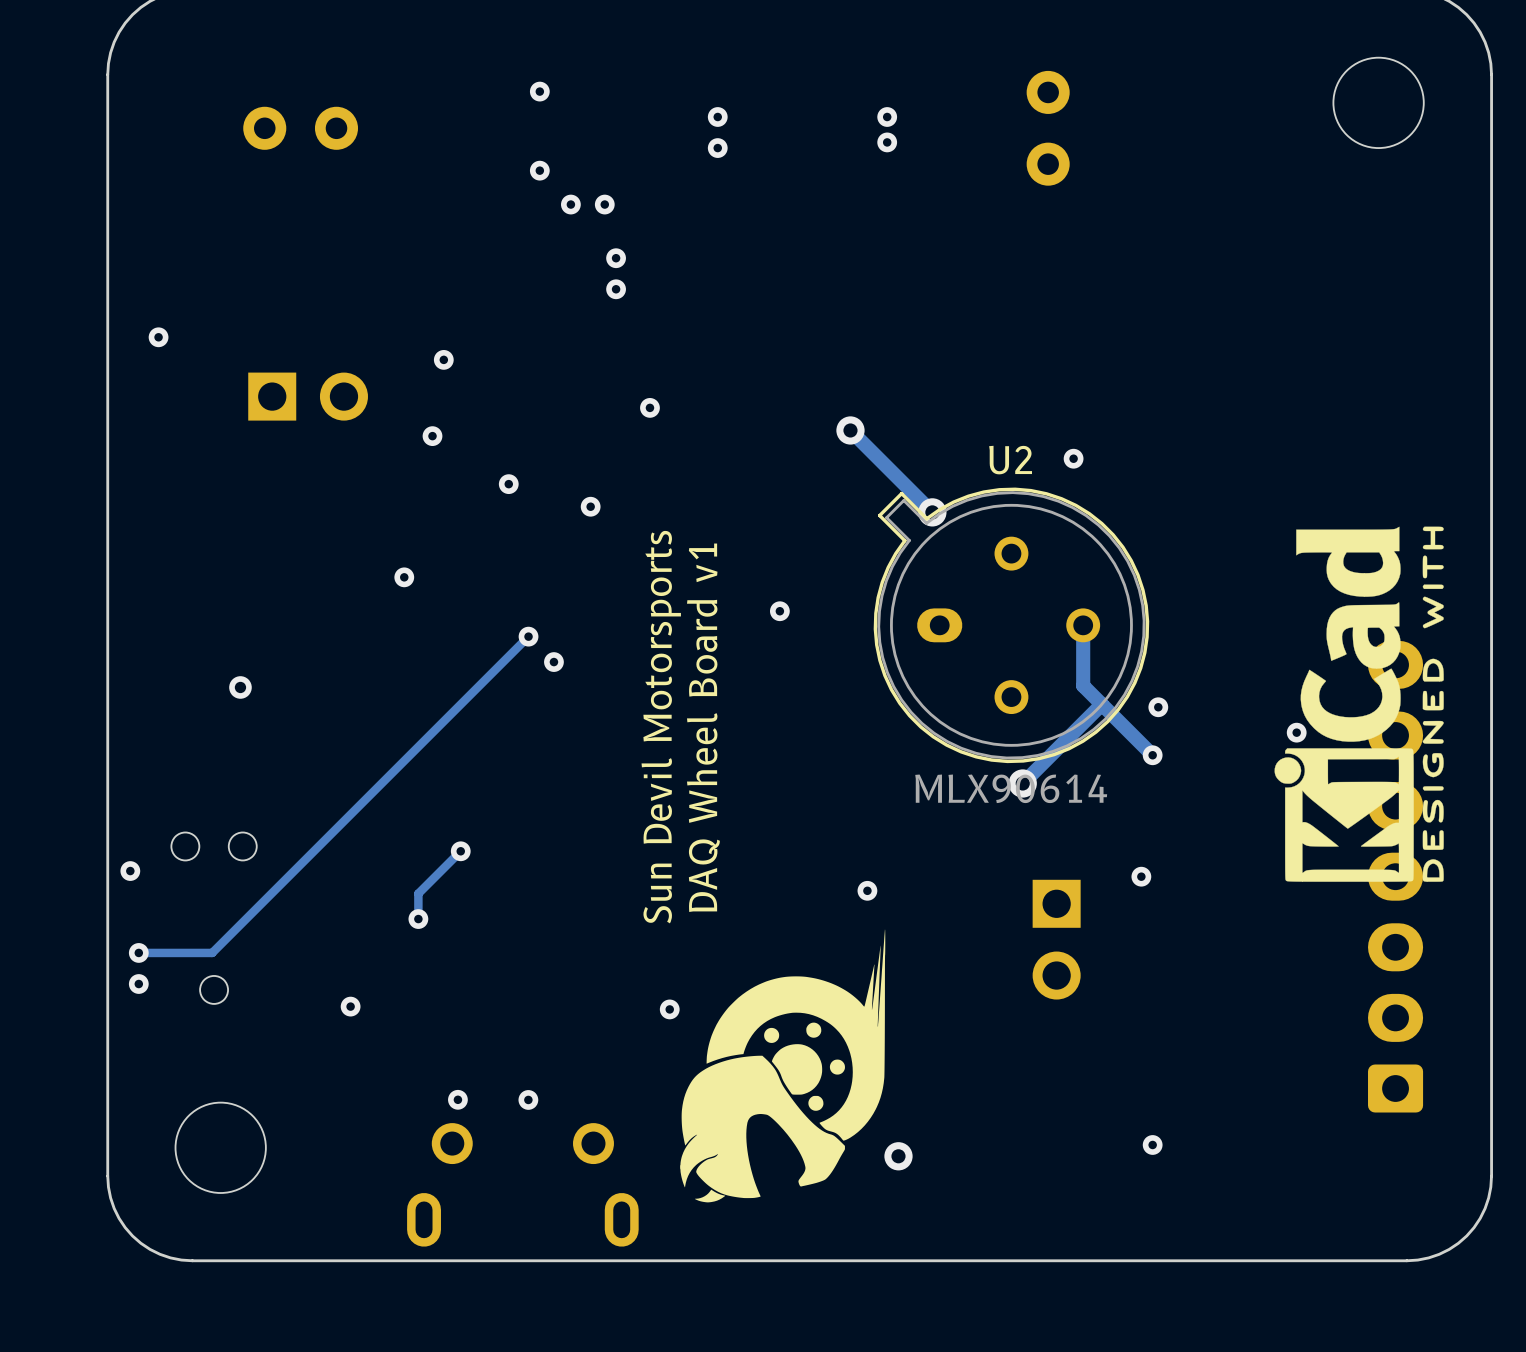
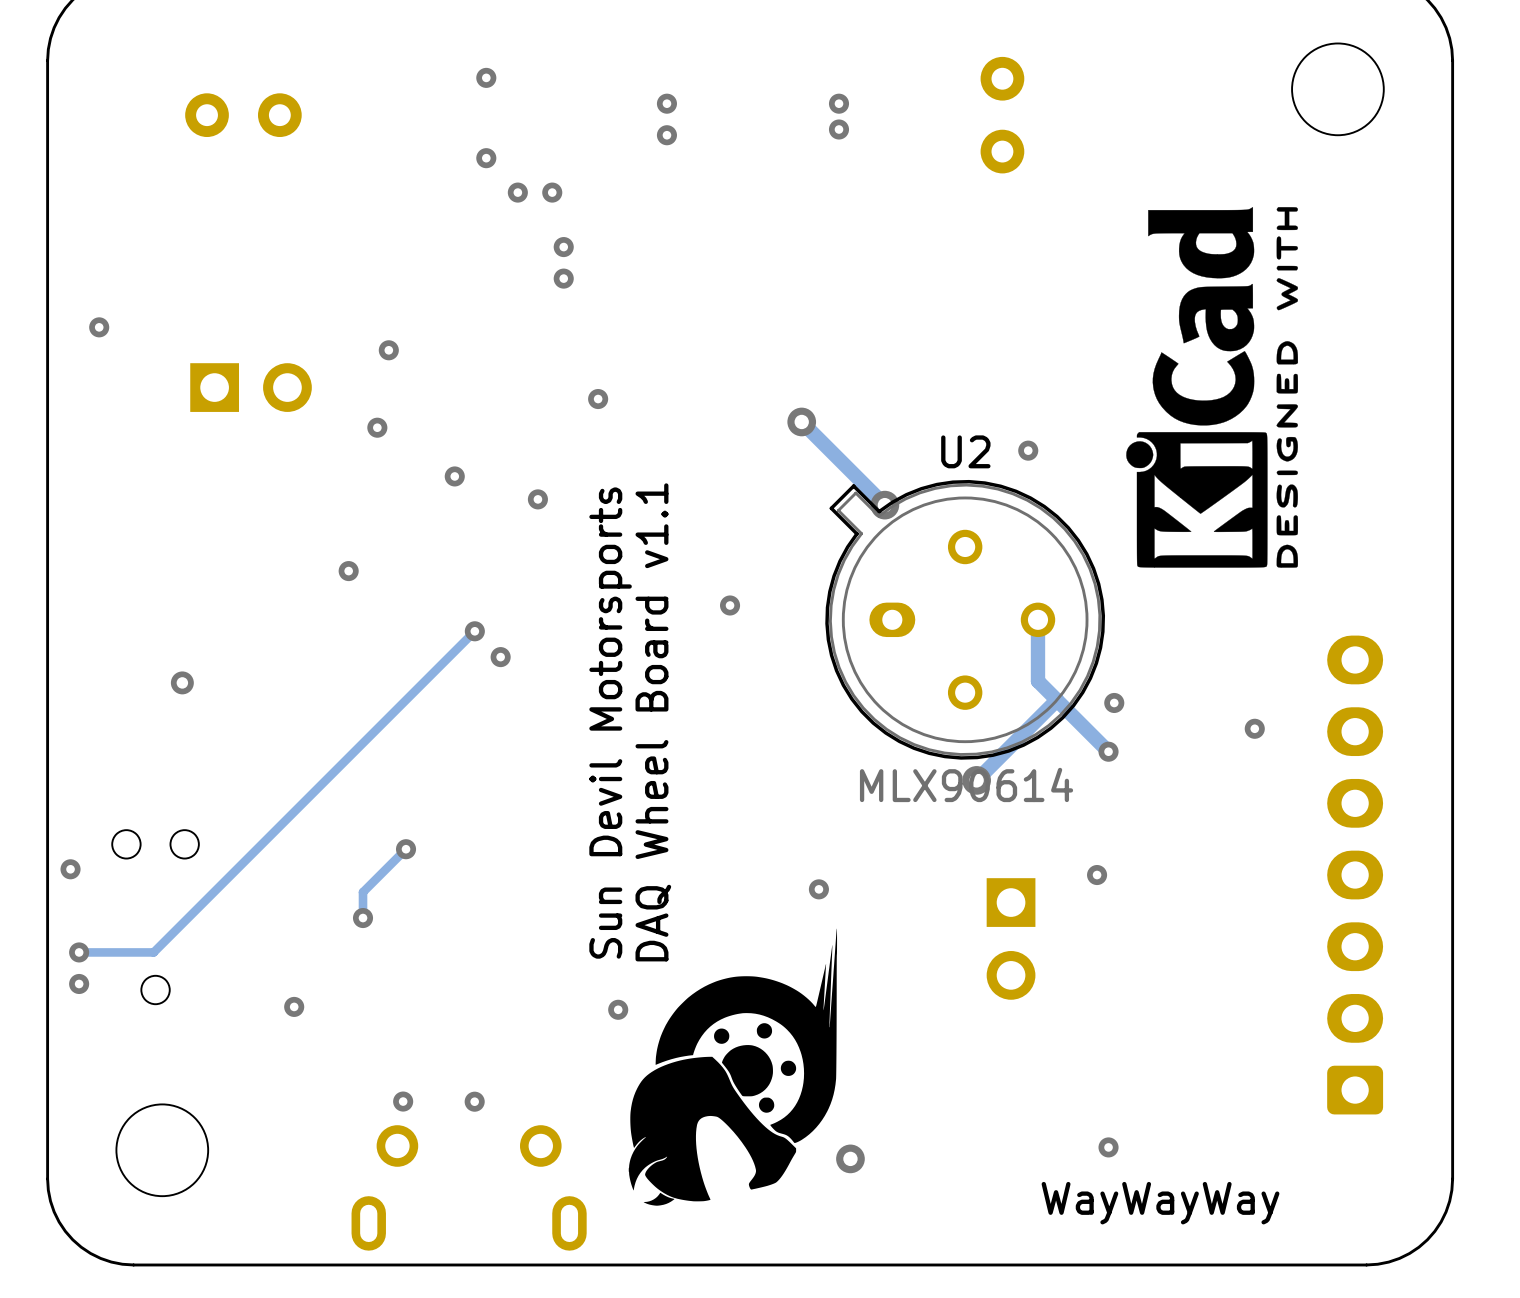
drawing position: (1359, 704) -> (1212, 387)
text: DAQ Wheel Board v1 (703, 727) -> DAQ Wheel Board v1.1 (653, 722)
text: none -> WayWayWay (1160, 1203)

